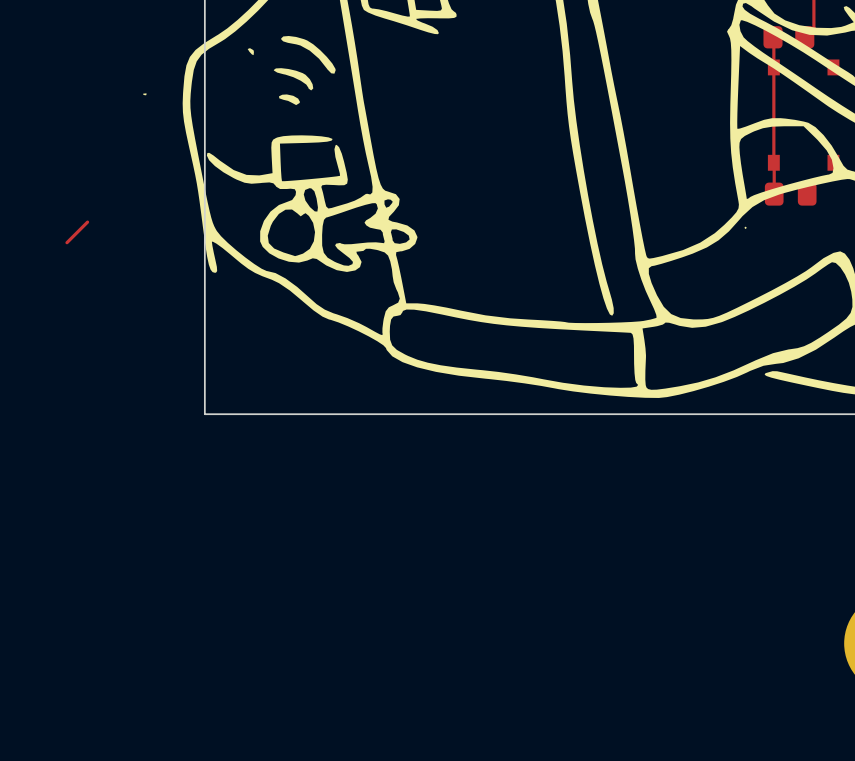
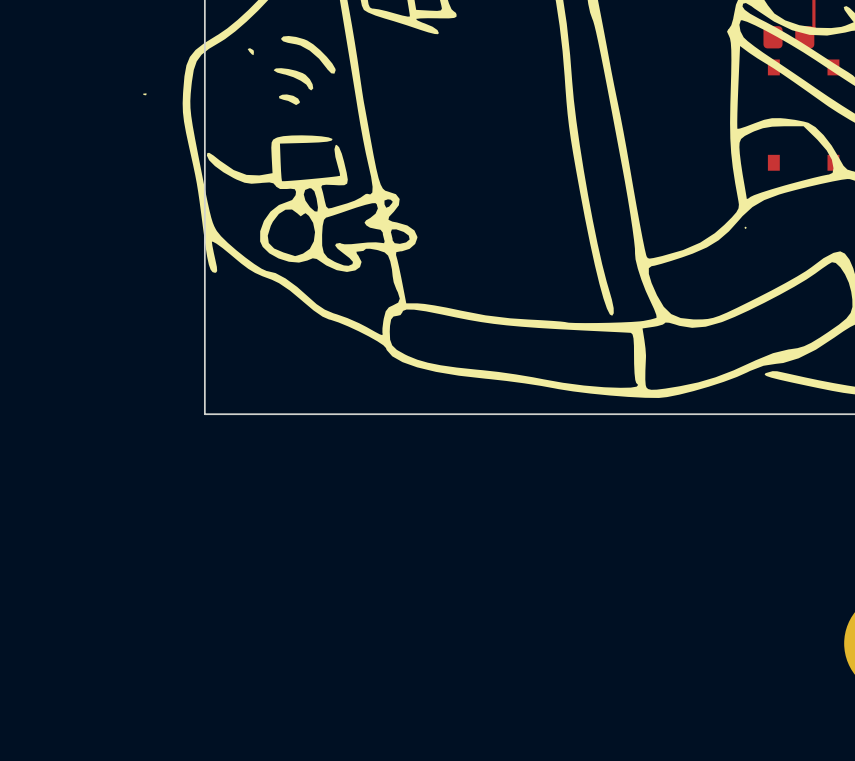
top track: (771, 32) (773, 35) (774, 194) -> none
part: (790, 194) -> none
top track: (87, 222) (66, 242) -> none

